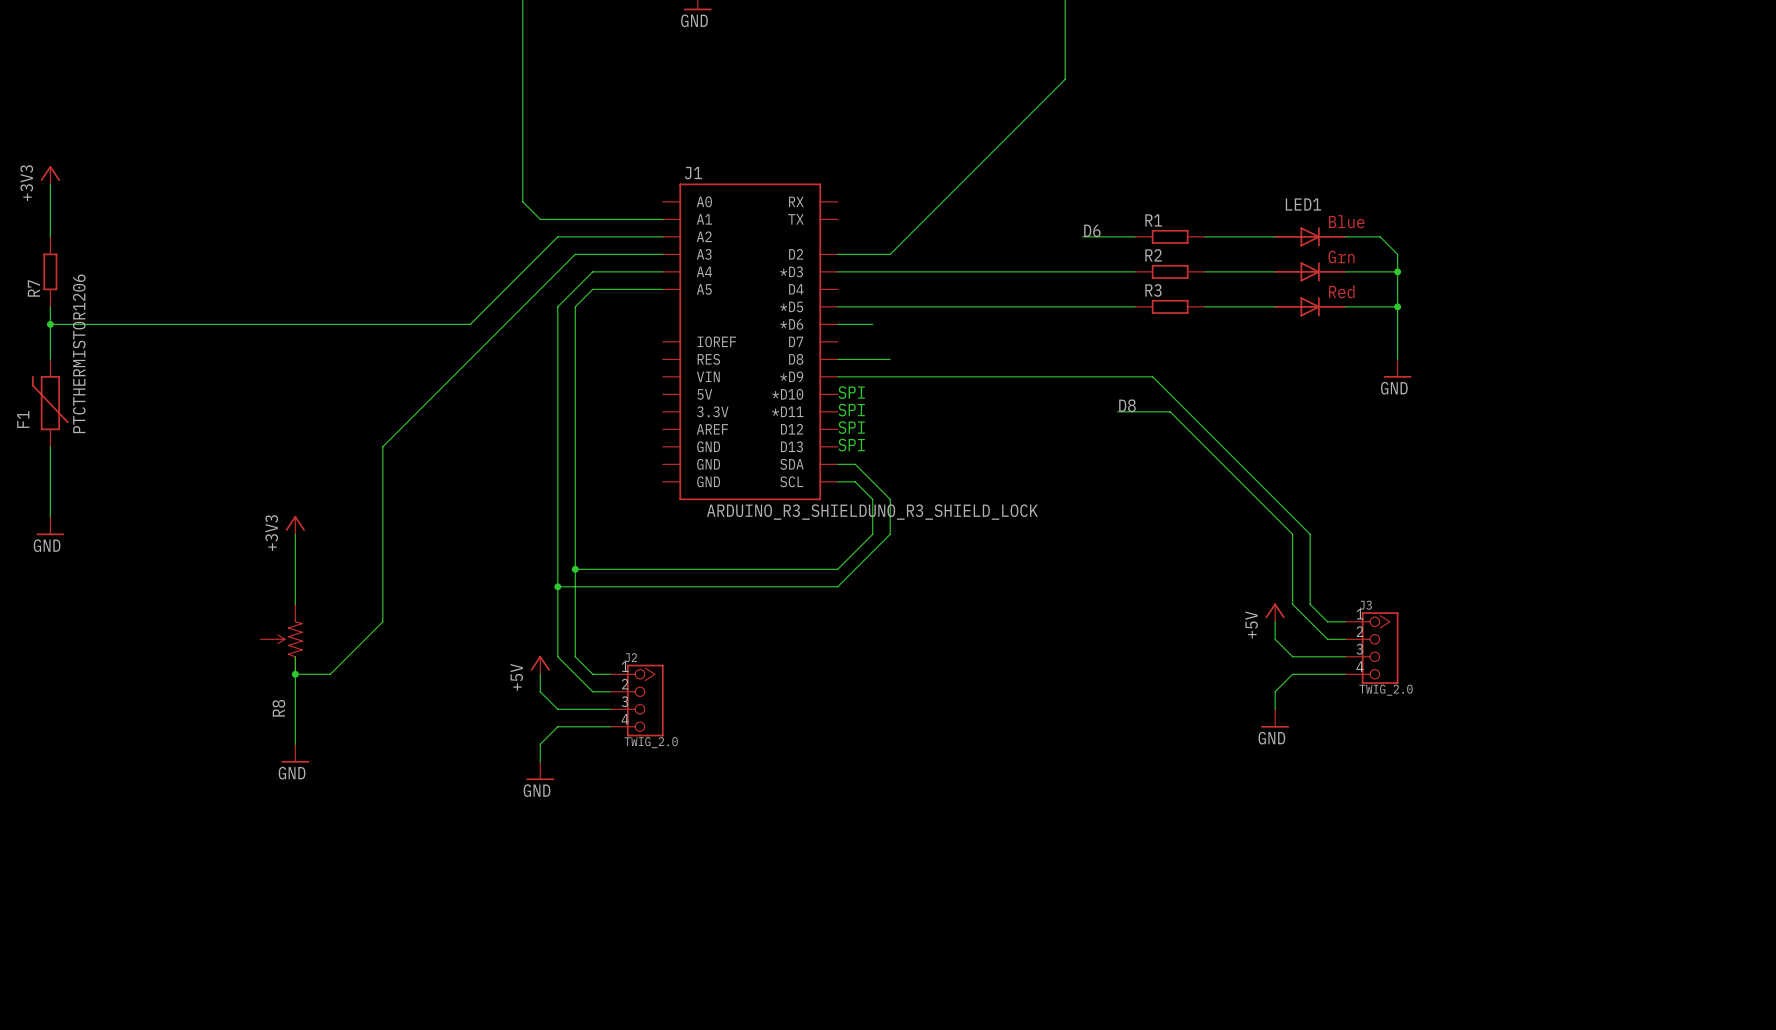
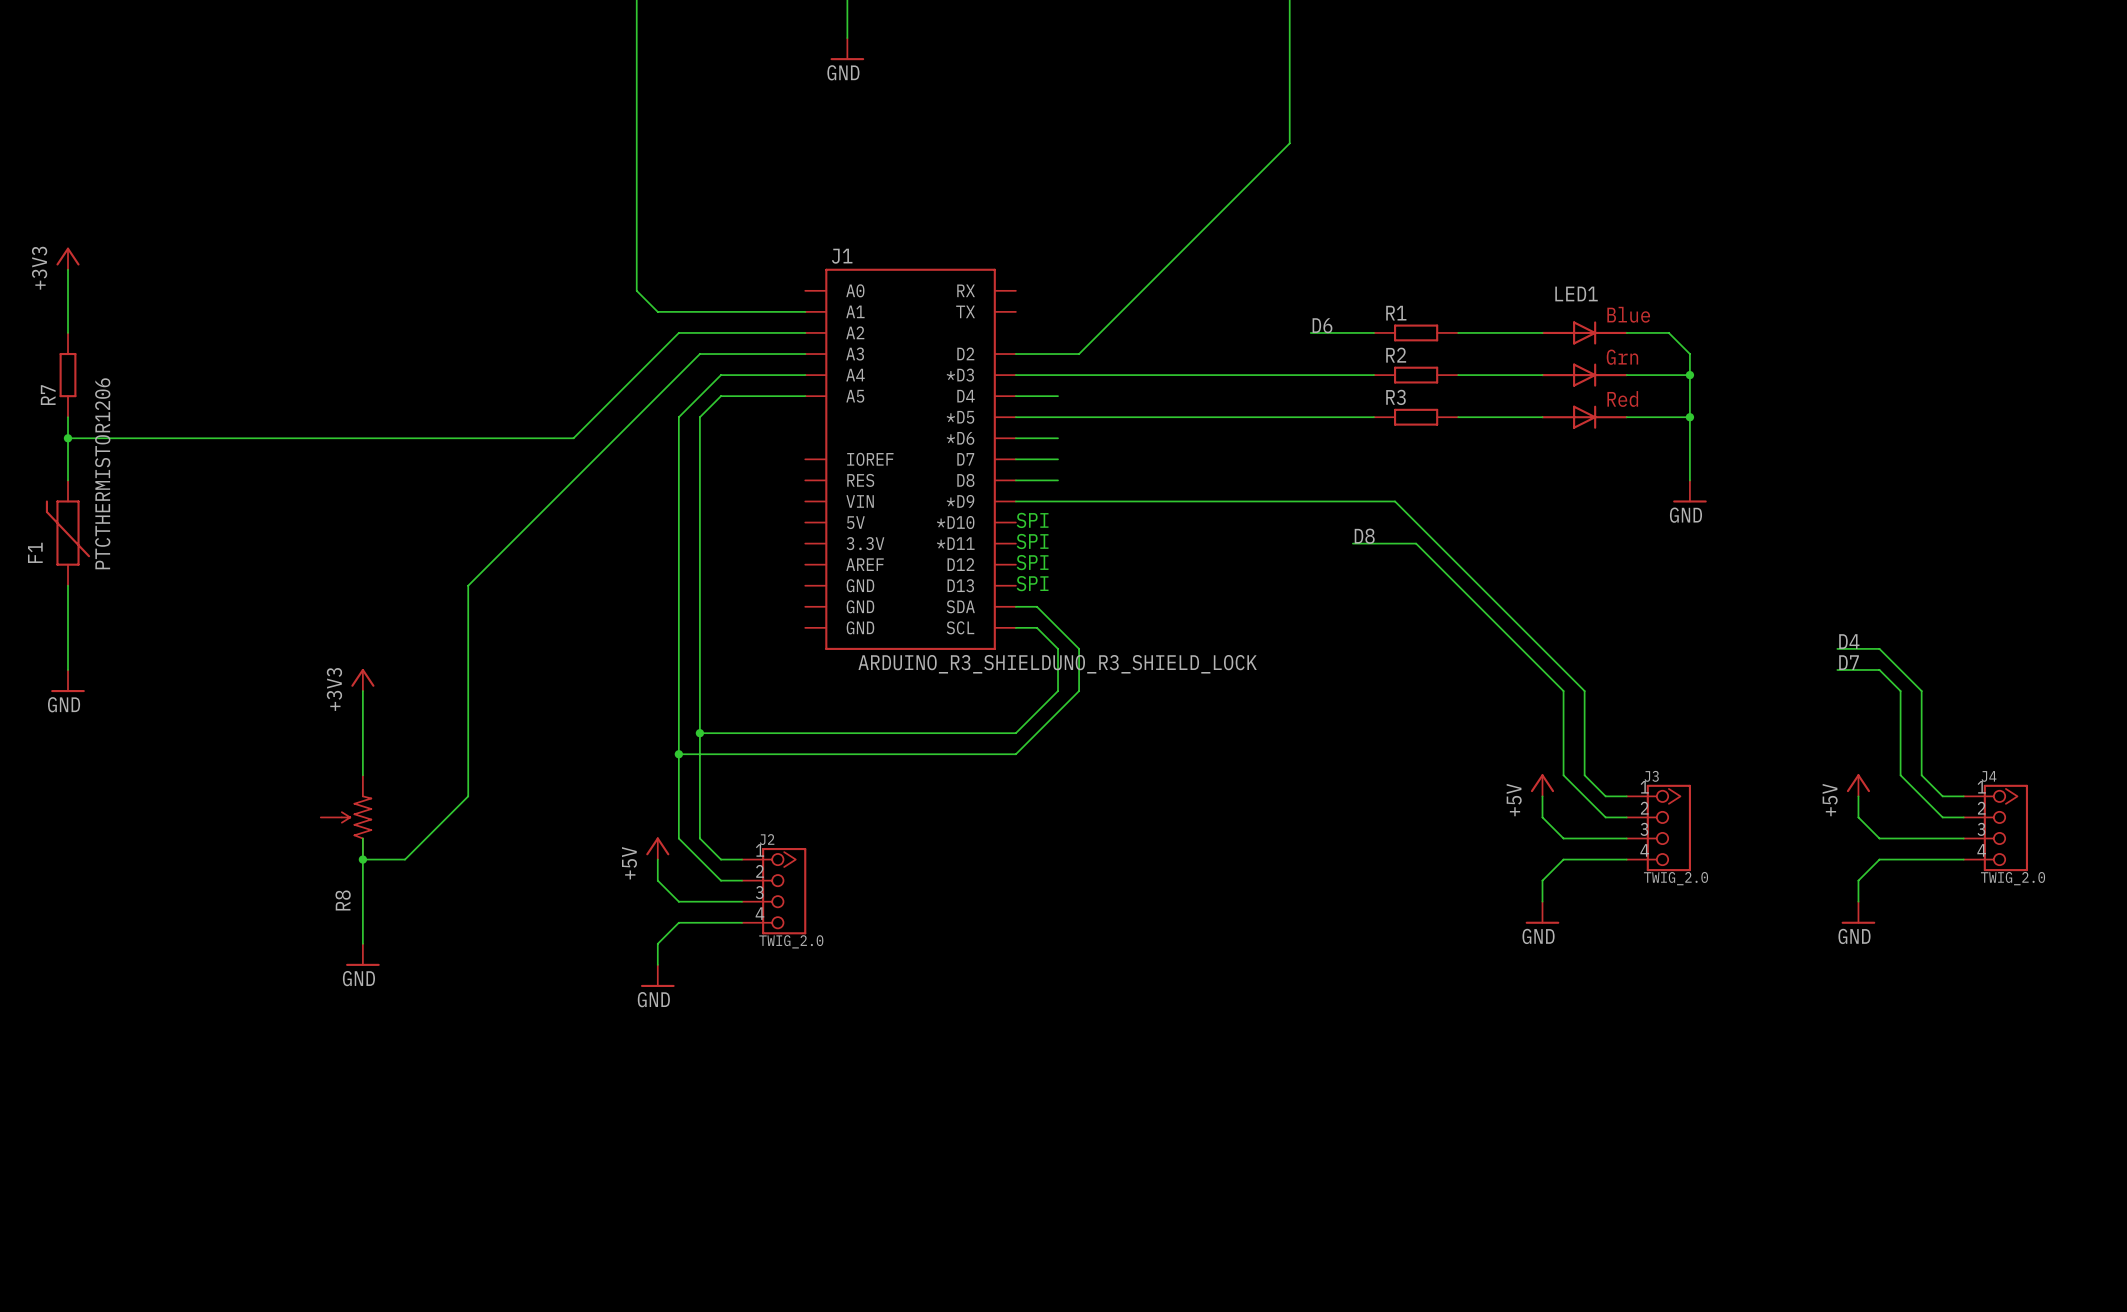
wire: none -> (1015, 396) (1058, 396)
wire: none -> (1015, 459) (1058, 459)
wire: (872, 359) (890, 359) -> none
label: none -> D4 (1849, 641)
wire: none -> (1837, 648) (1879, 648) (1921, 691) (1921, 775) (1942, 796) (1963, 796)
label: none -> D7 (1849, 662)
wire: none -> (1837, 669) (1879, 669) (1900, 691) (1900, 775) (1942, 817) (1963, 817)
power symbol: none -> +5V (1858, 785)
wire: none -> (1858, 796) (1858, 817) (1879, 838) (1963, 838)
J4: none -> TWIG_2.0 (1995, 827)
wire: none -> (1963, 859) (1879, 859) (1858, 880) (1858, 901)
power symbol: none -> GND (1858, 912)

